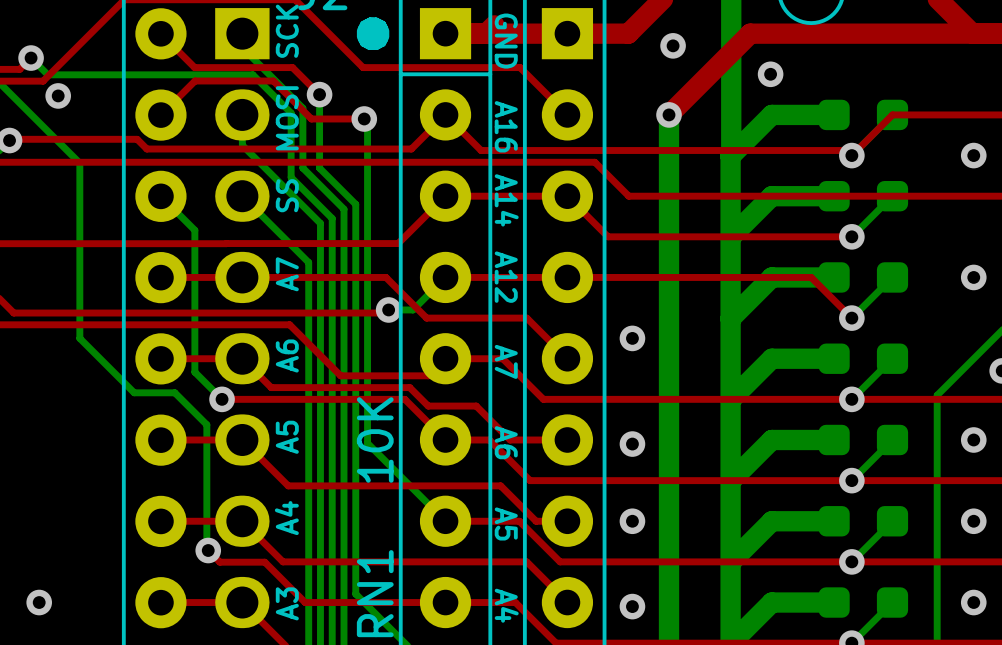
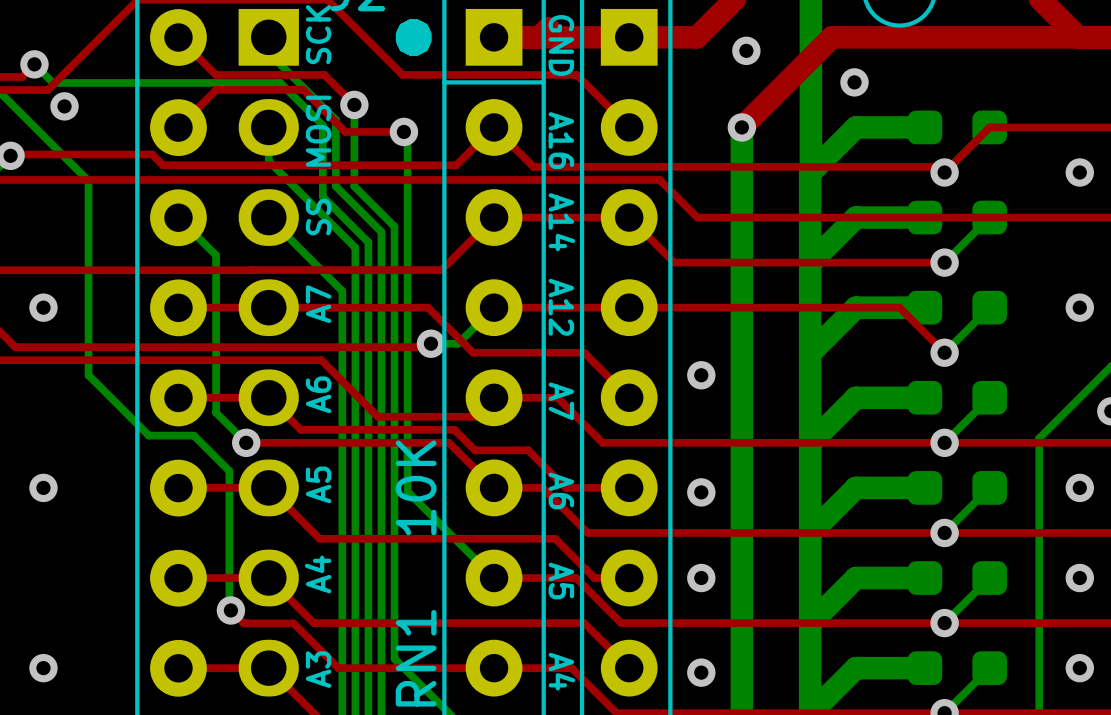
via: none -> (43, 307)
via: none -> (43, 487)

